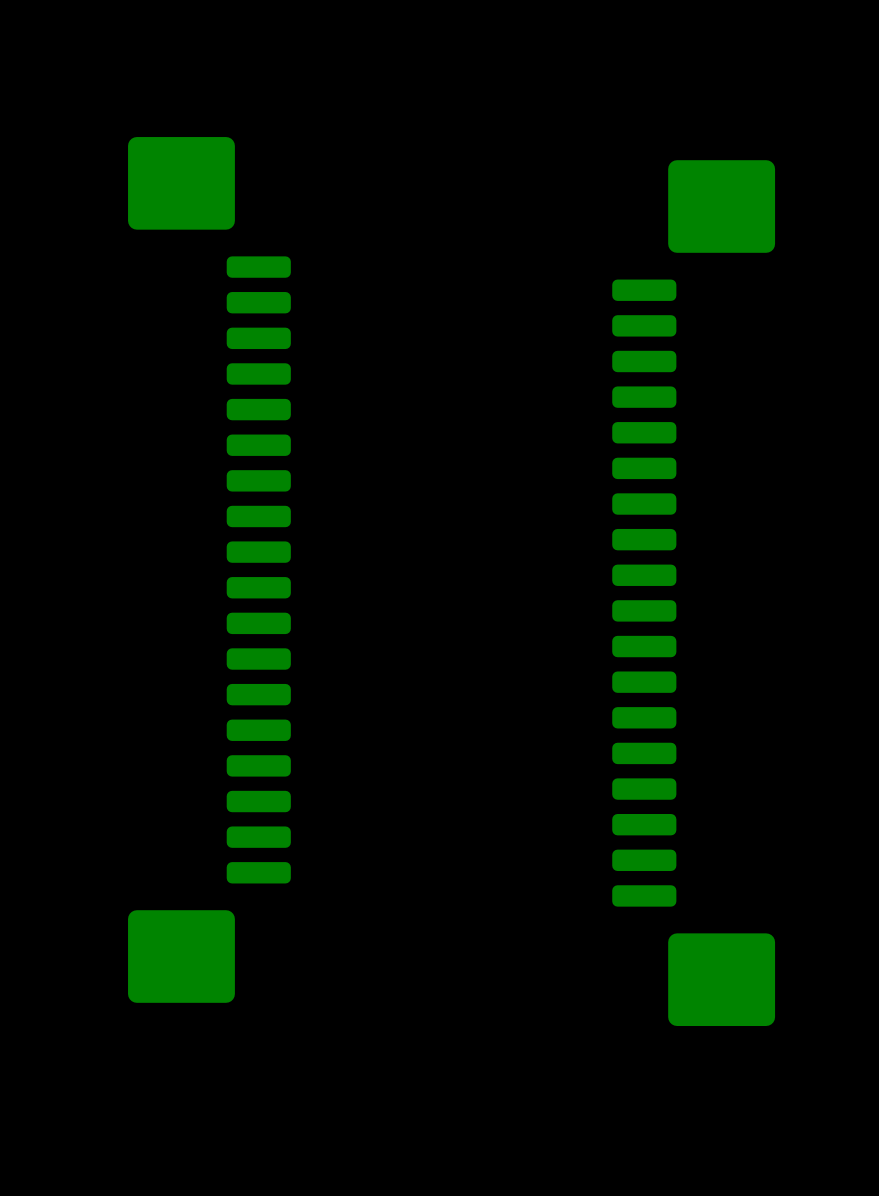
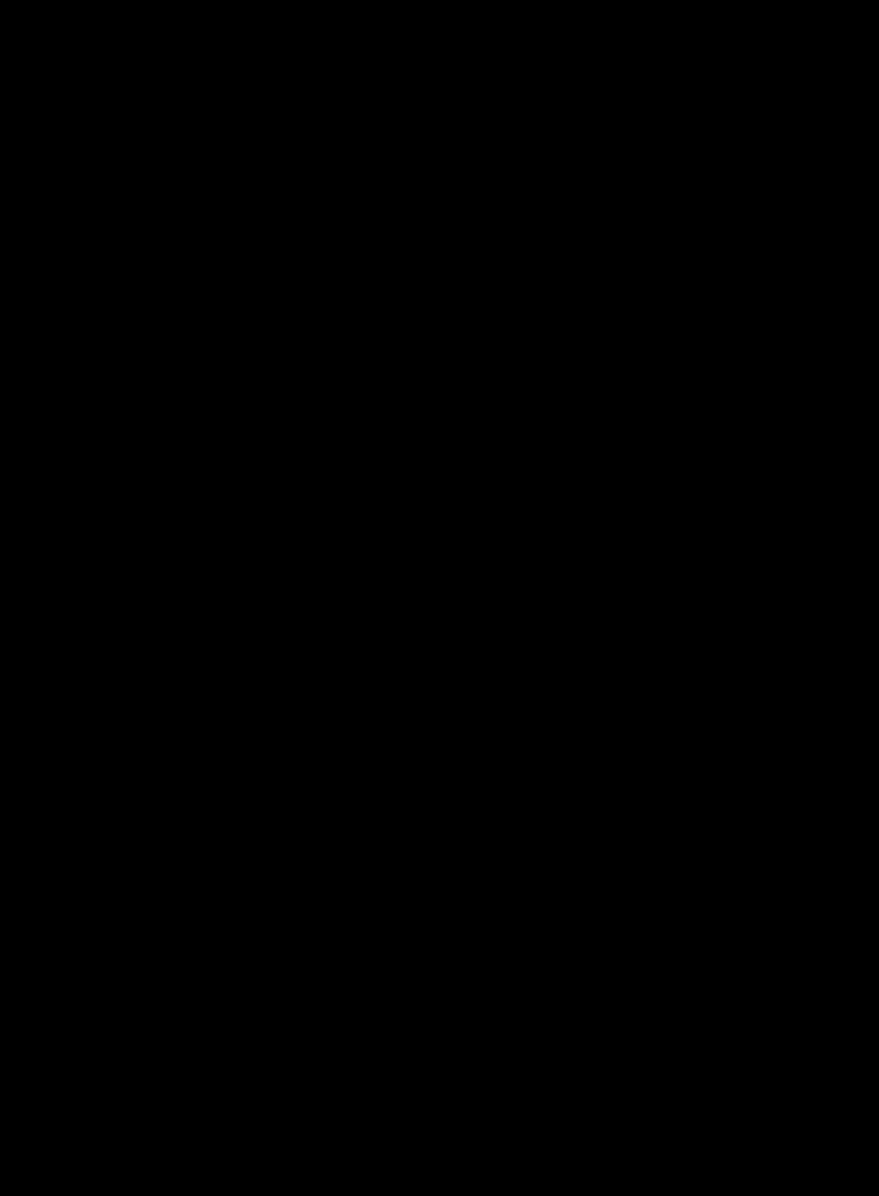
part: (209, 569) -> none
part: (693, 593) -> none

